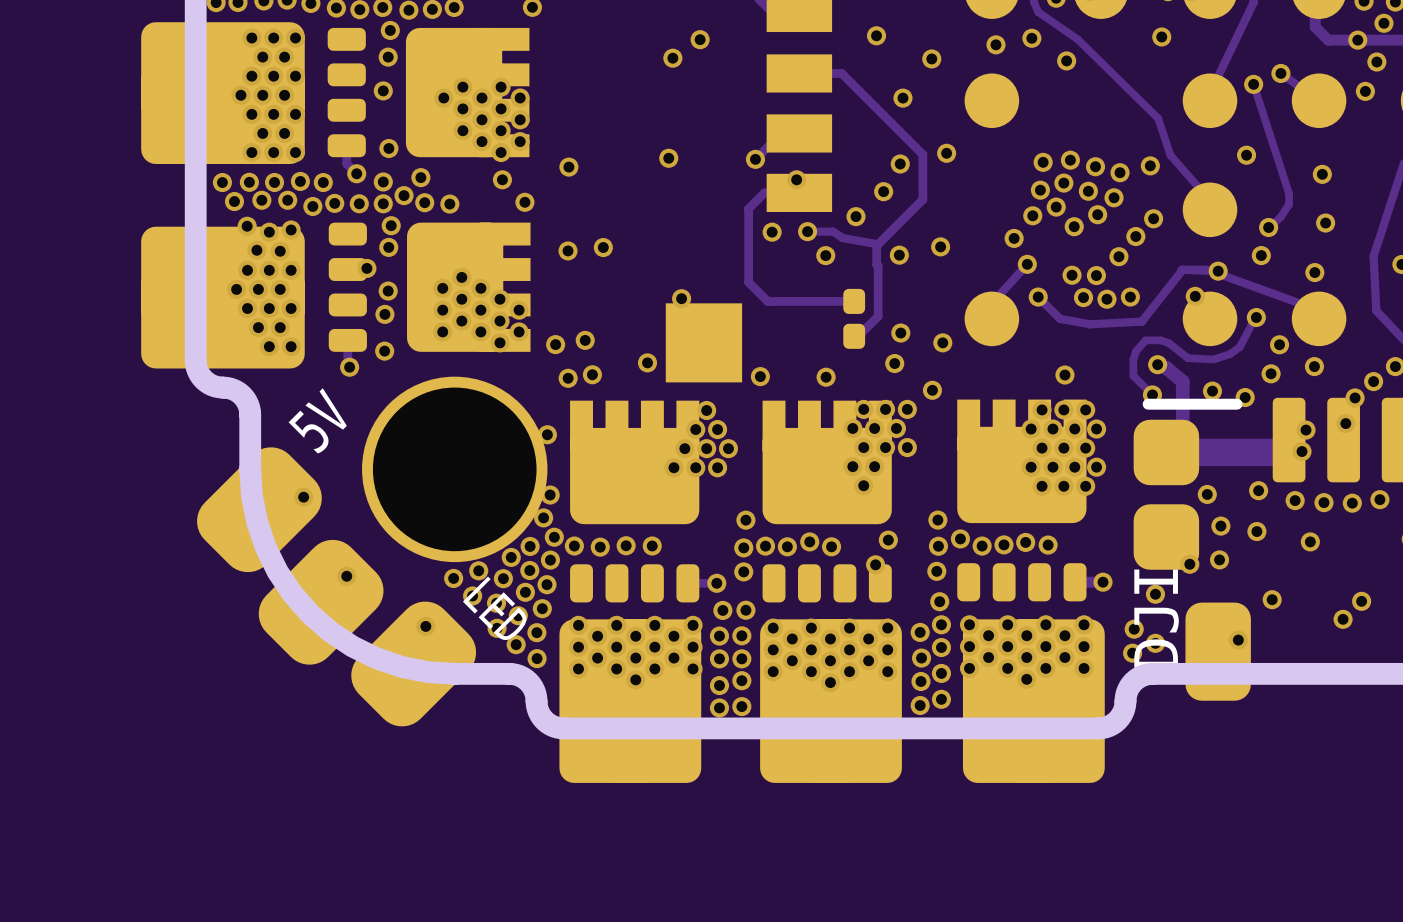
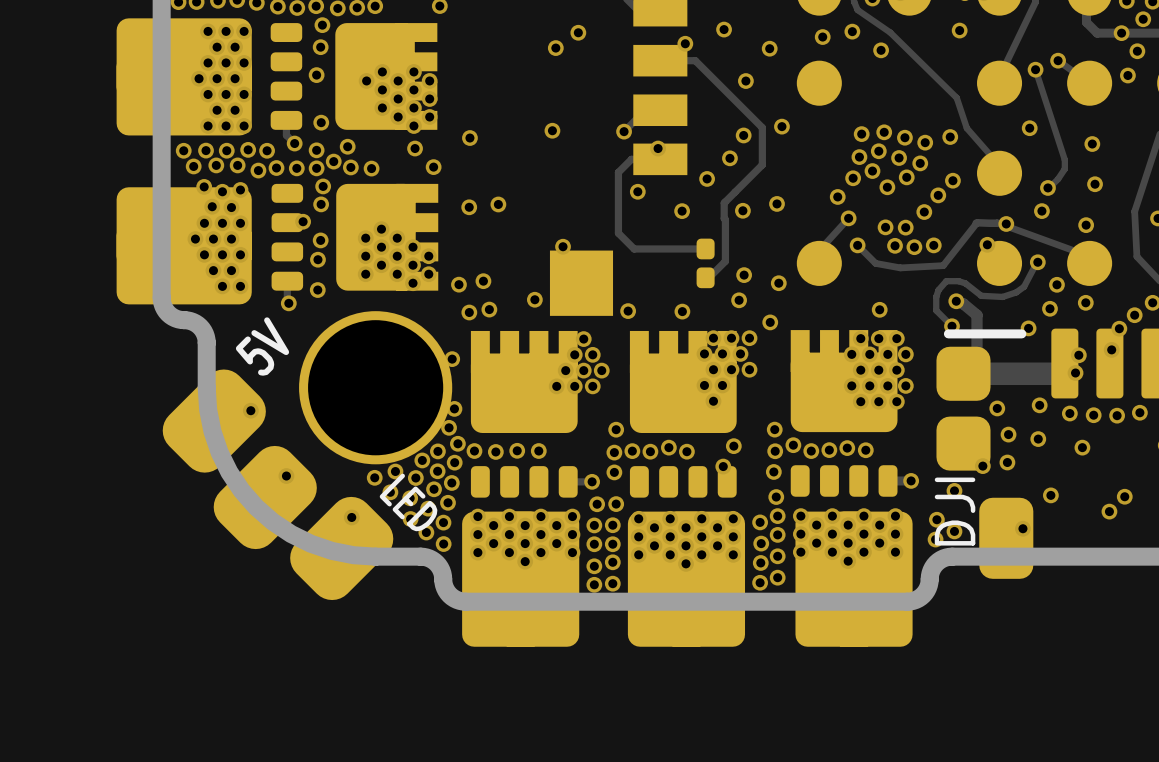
track: (807, 231) (833, 231) (843, 238) (878, 244) -> none
via position: (807, 231) -> (685, 43)
via: (1212, 391) -> none

